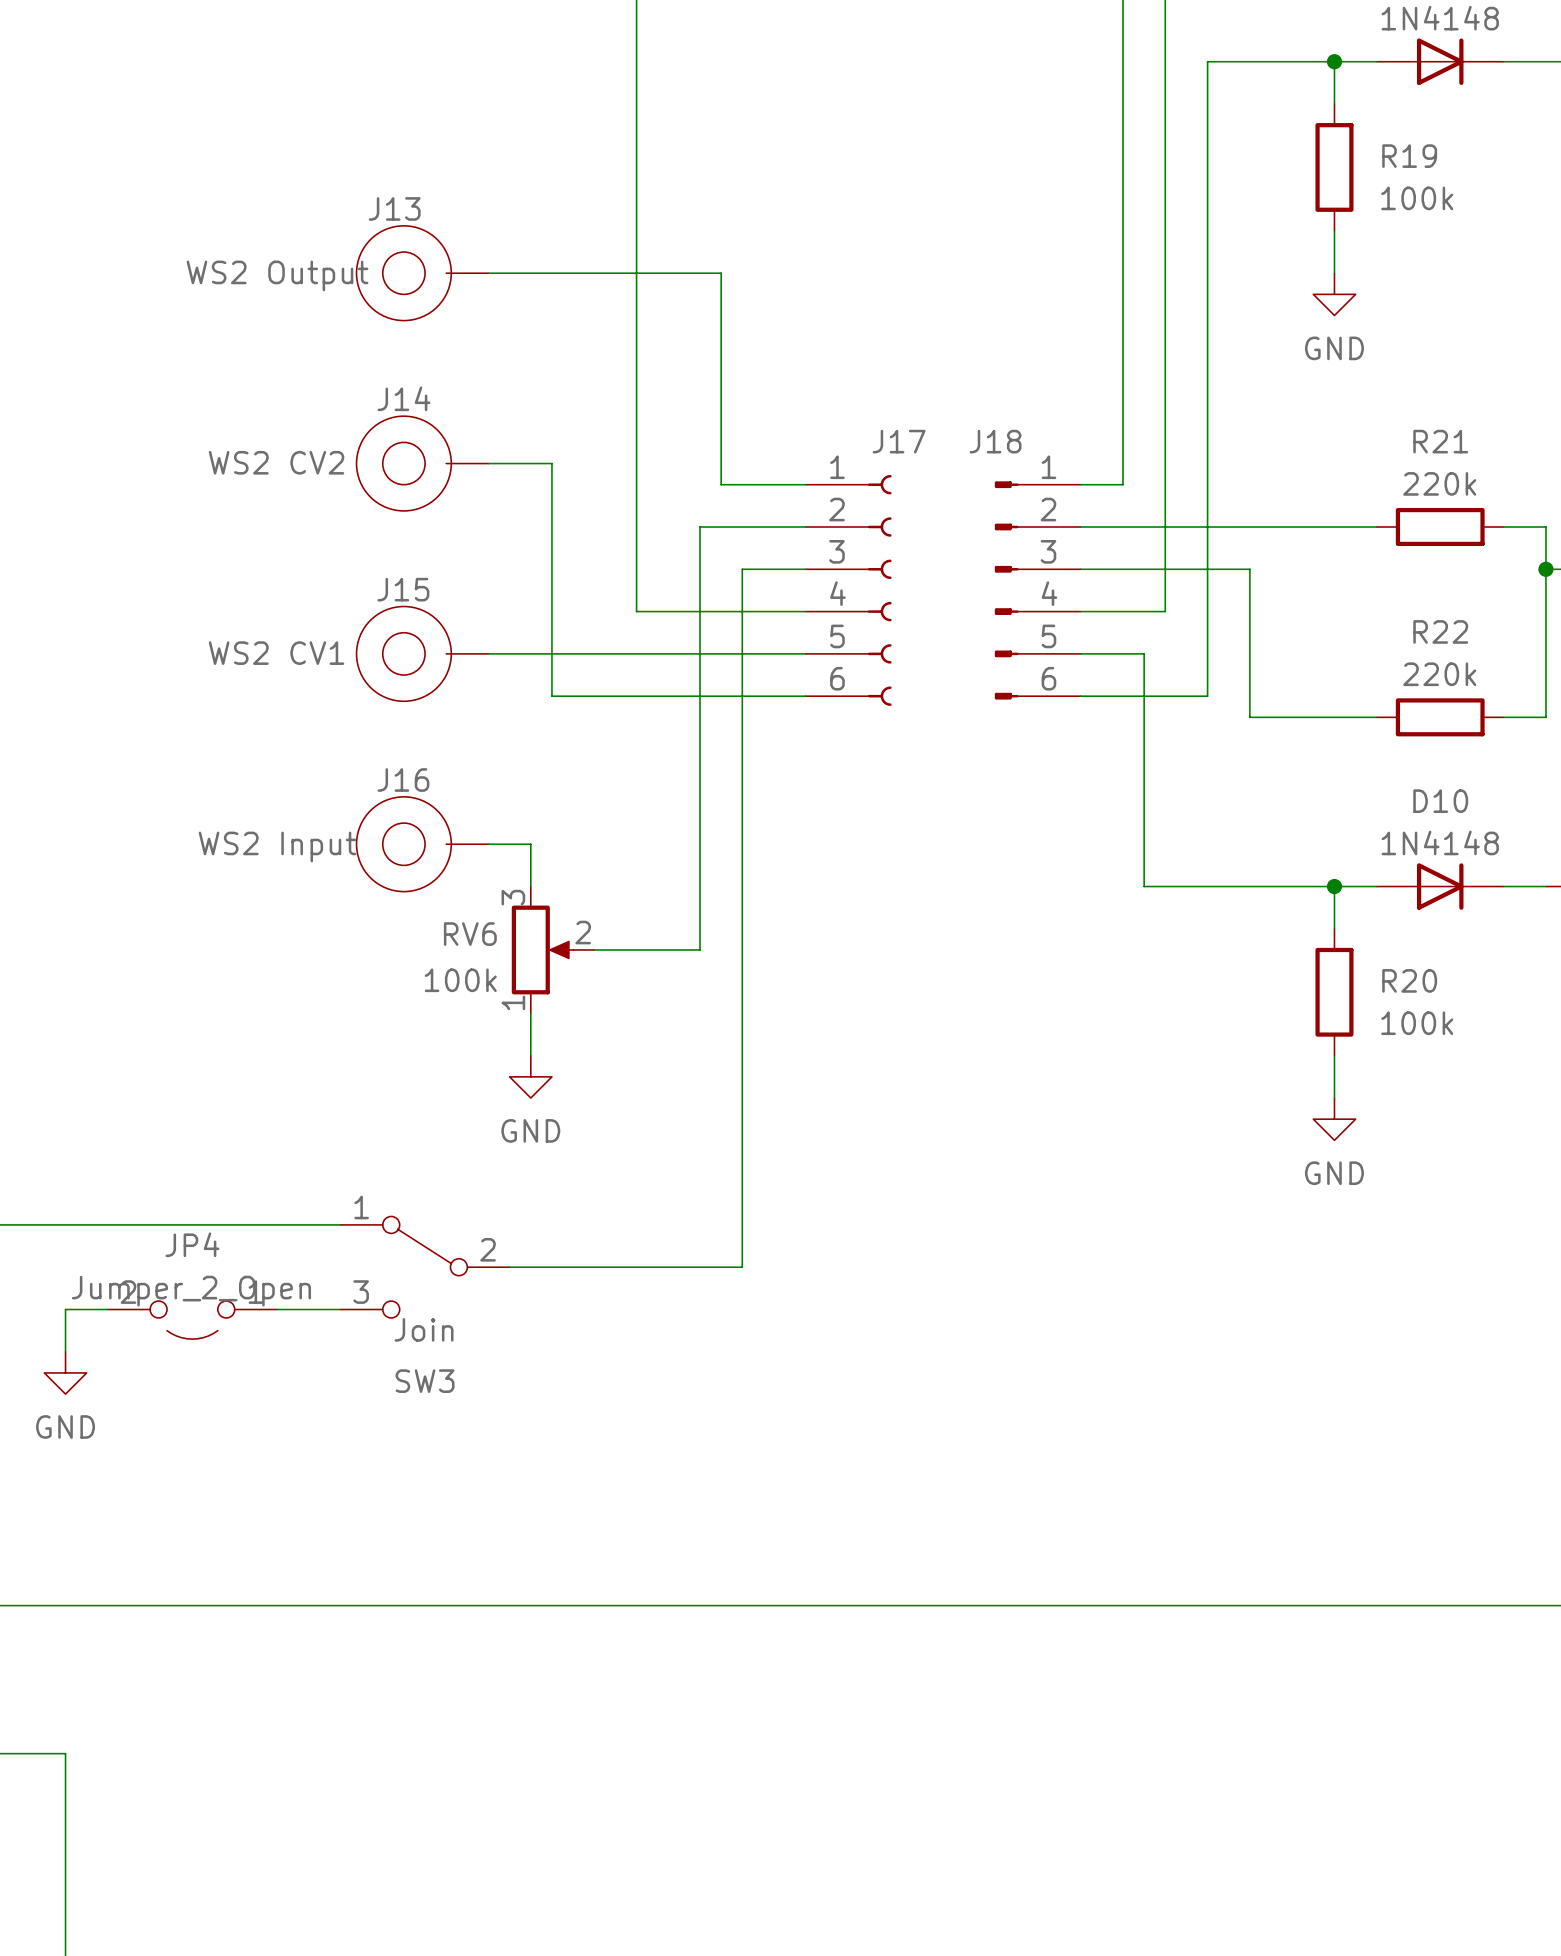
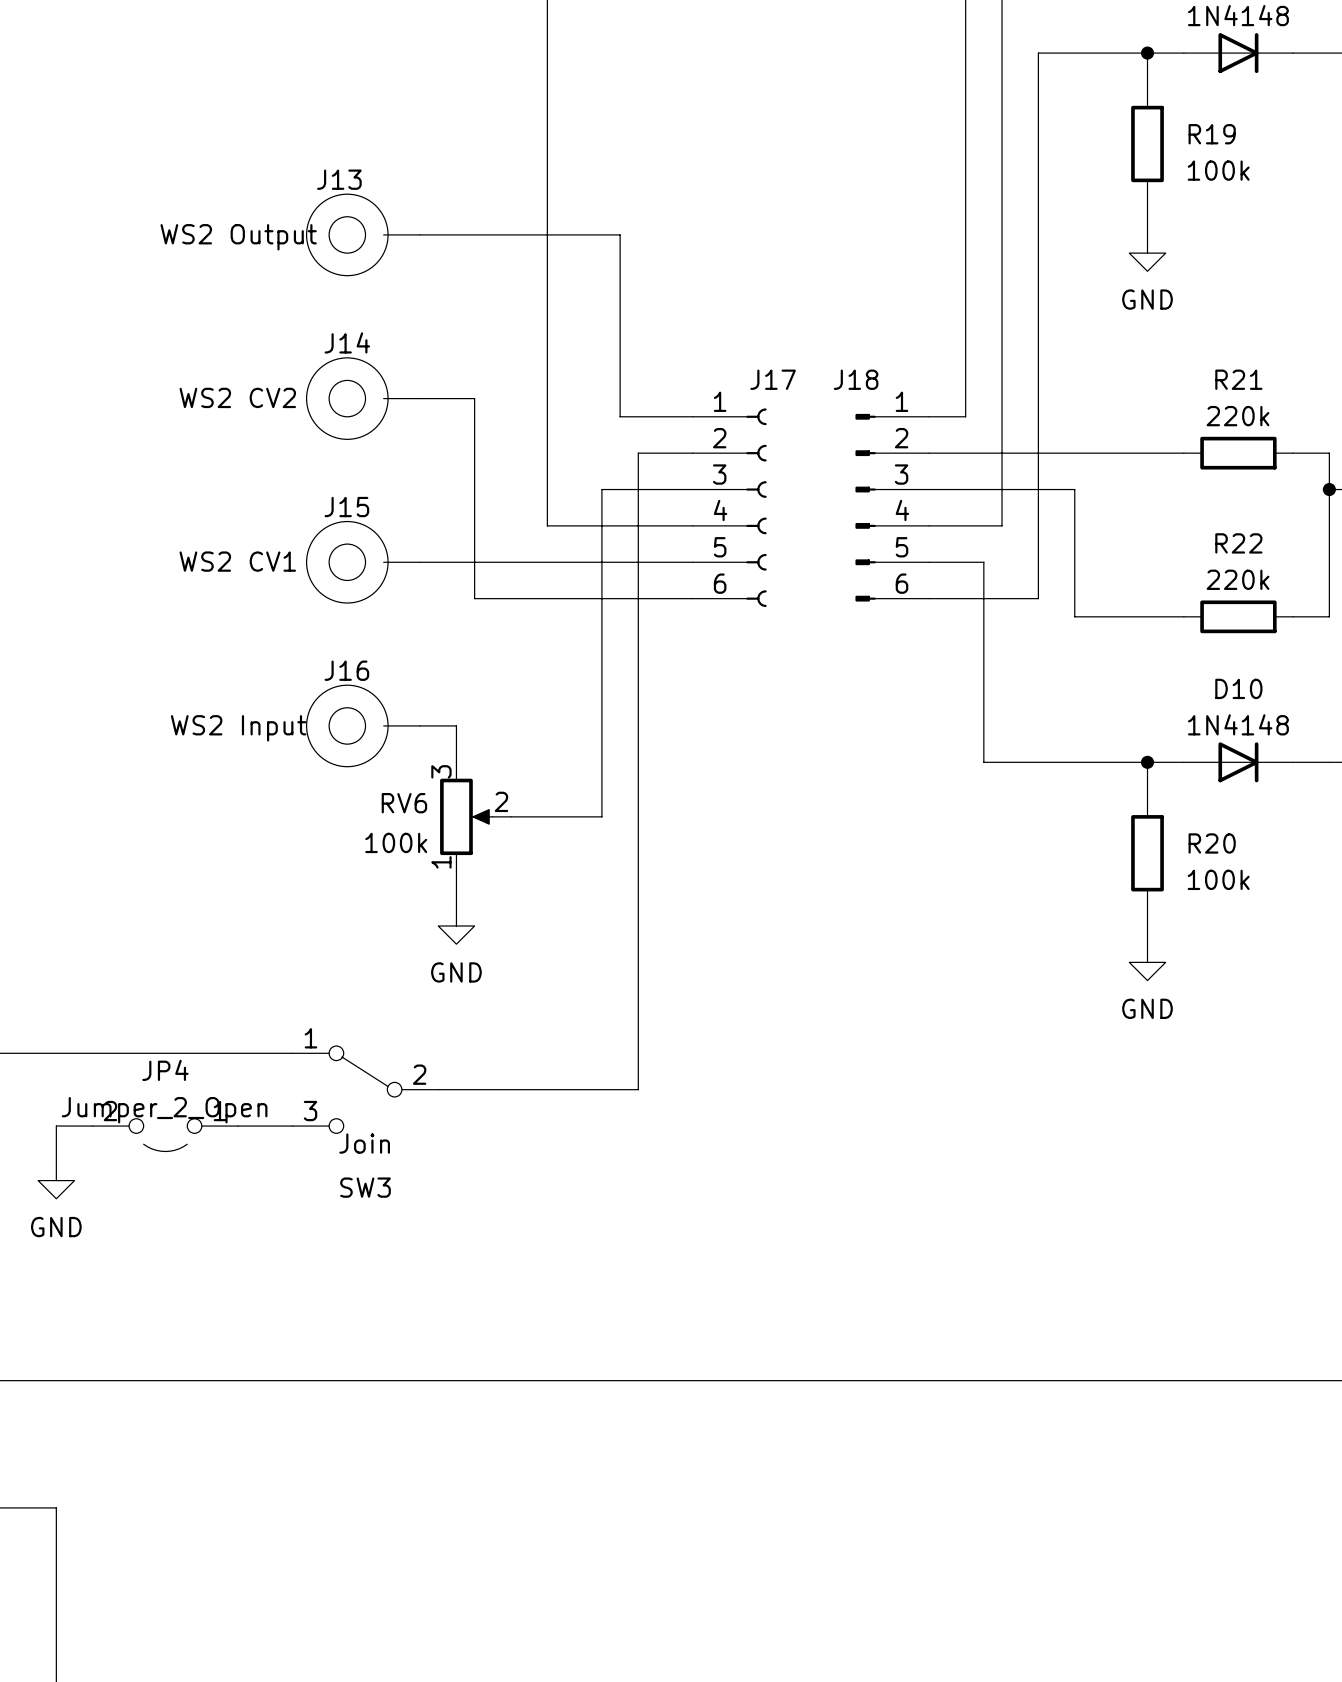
wire: (742, 526) (700, 526) (700, 569) -> (638, 453) (638, 489) (601, 489)

